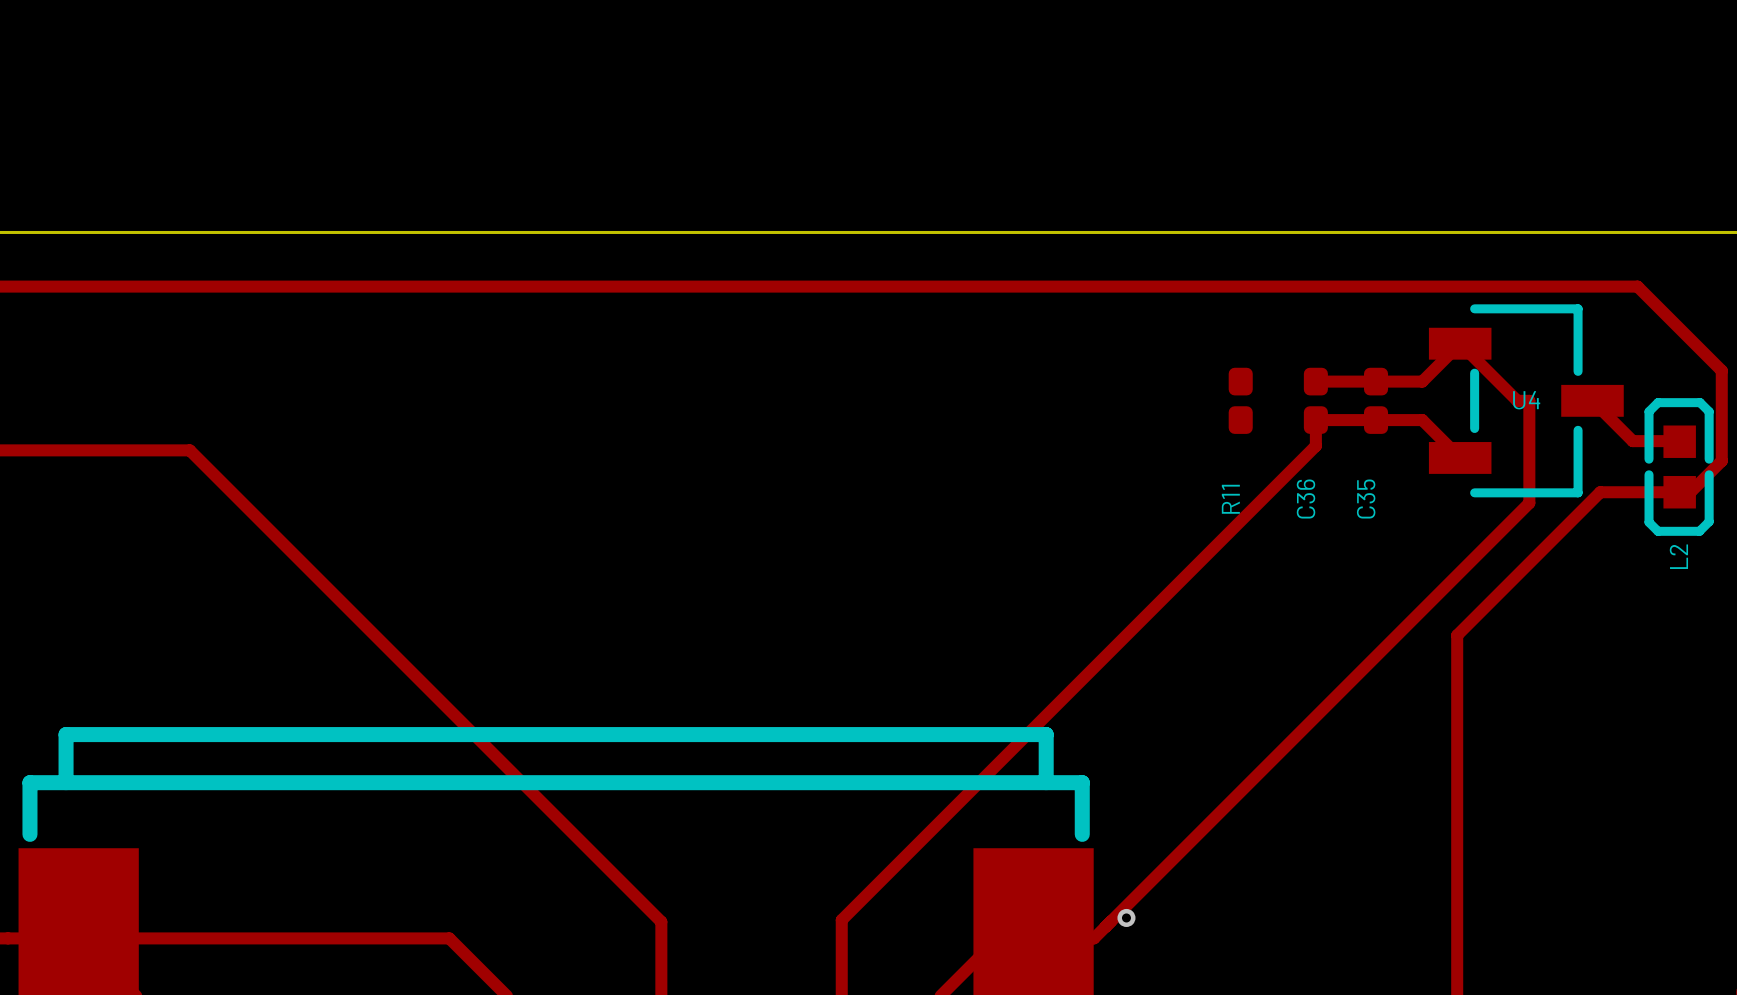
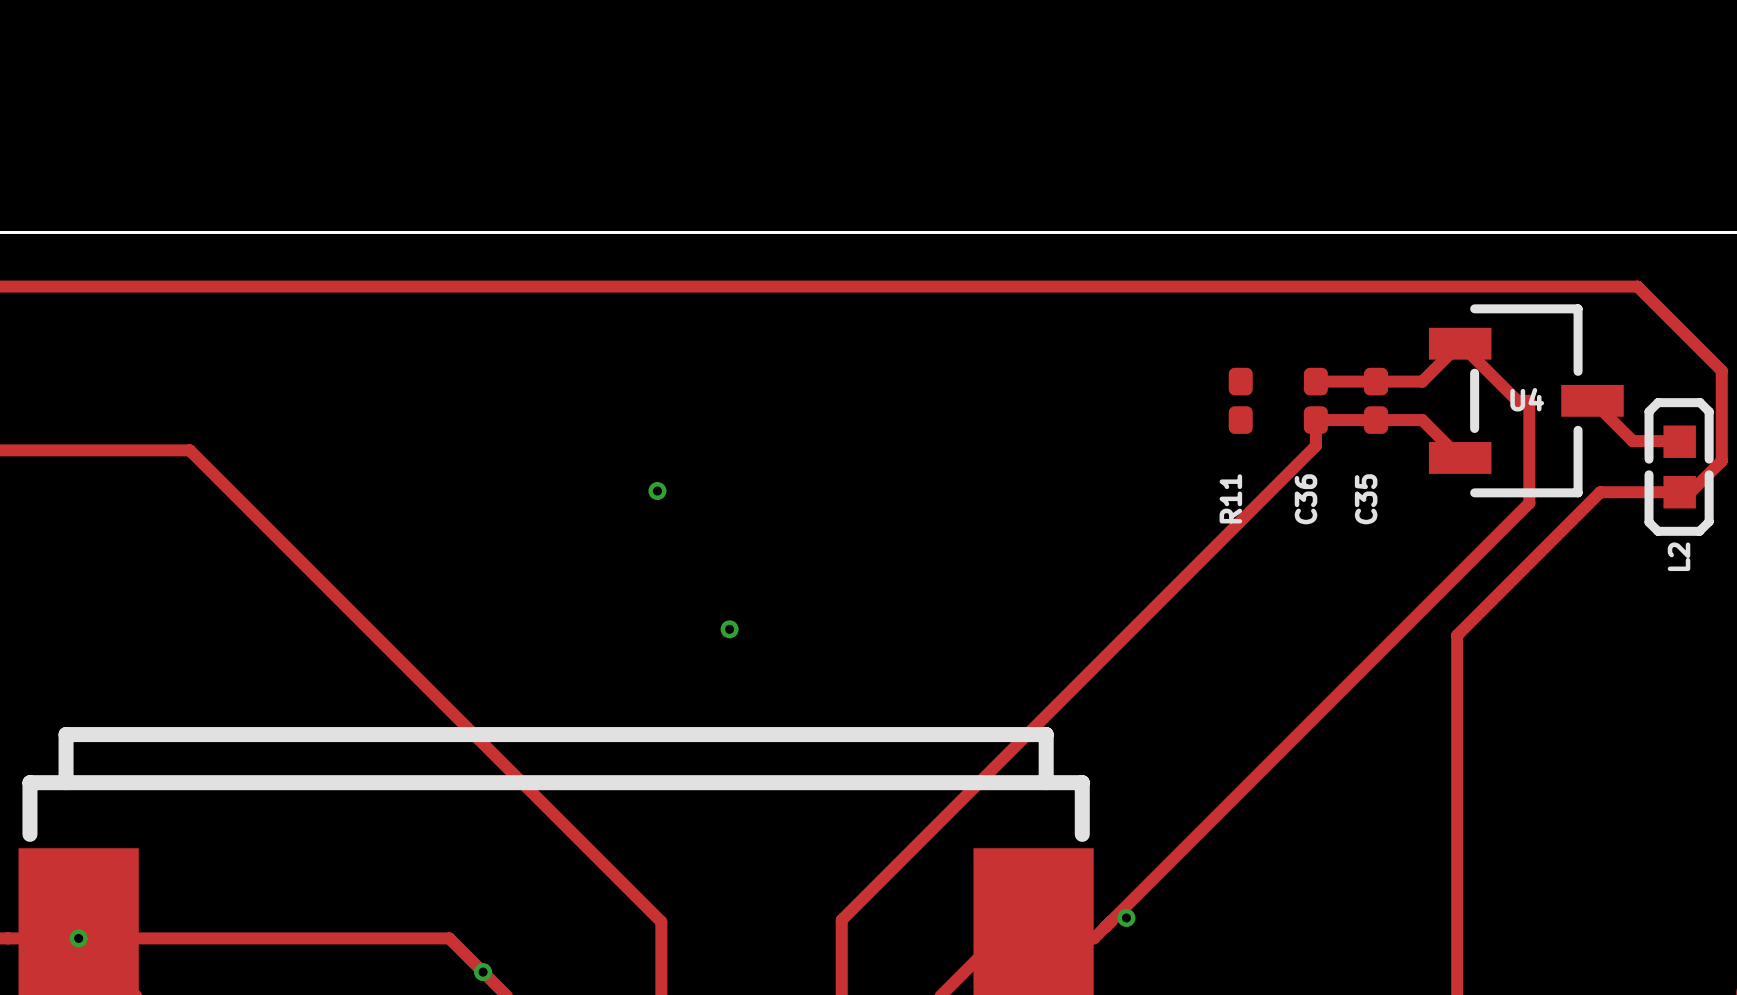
via: none -> (657, 491)
via: none -> (729, 629)
via: none -> (78, 938)
via: none -> (483, 972)

